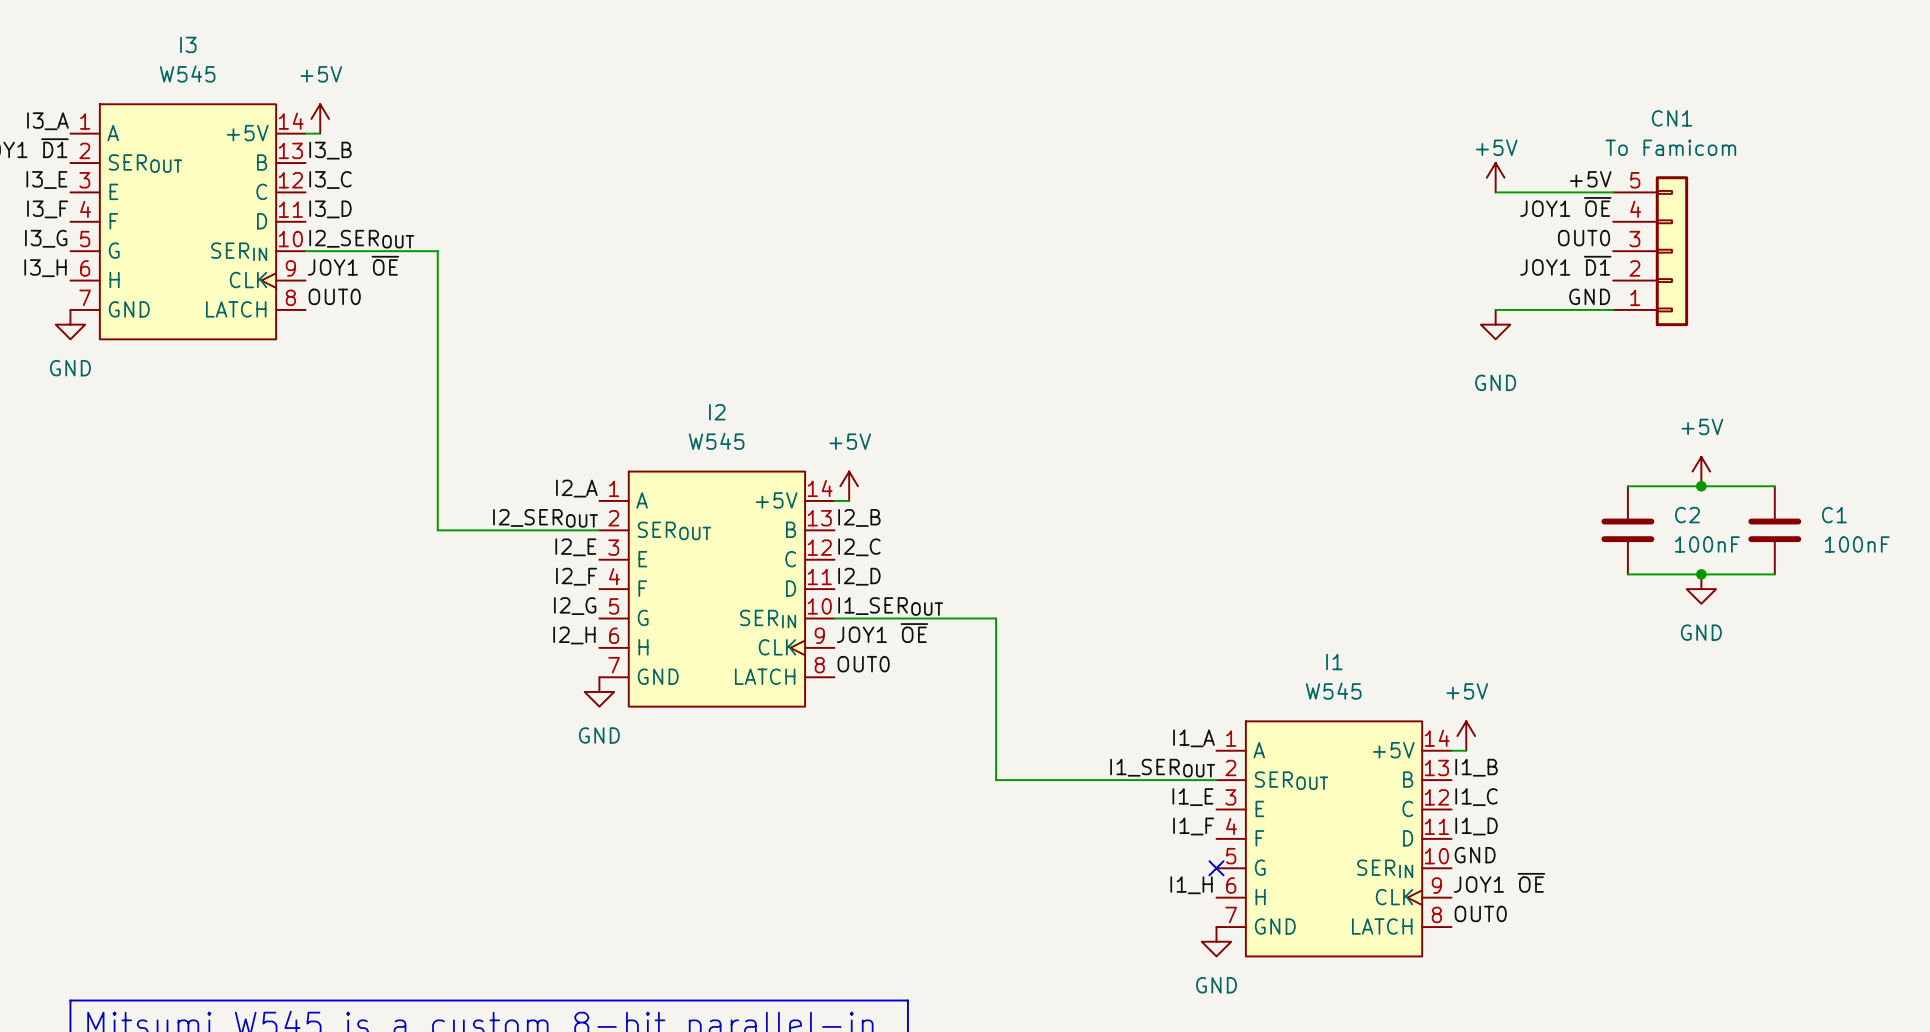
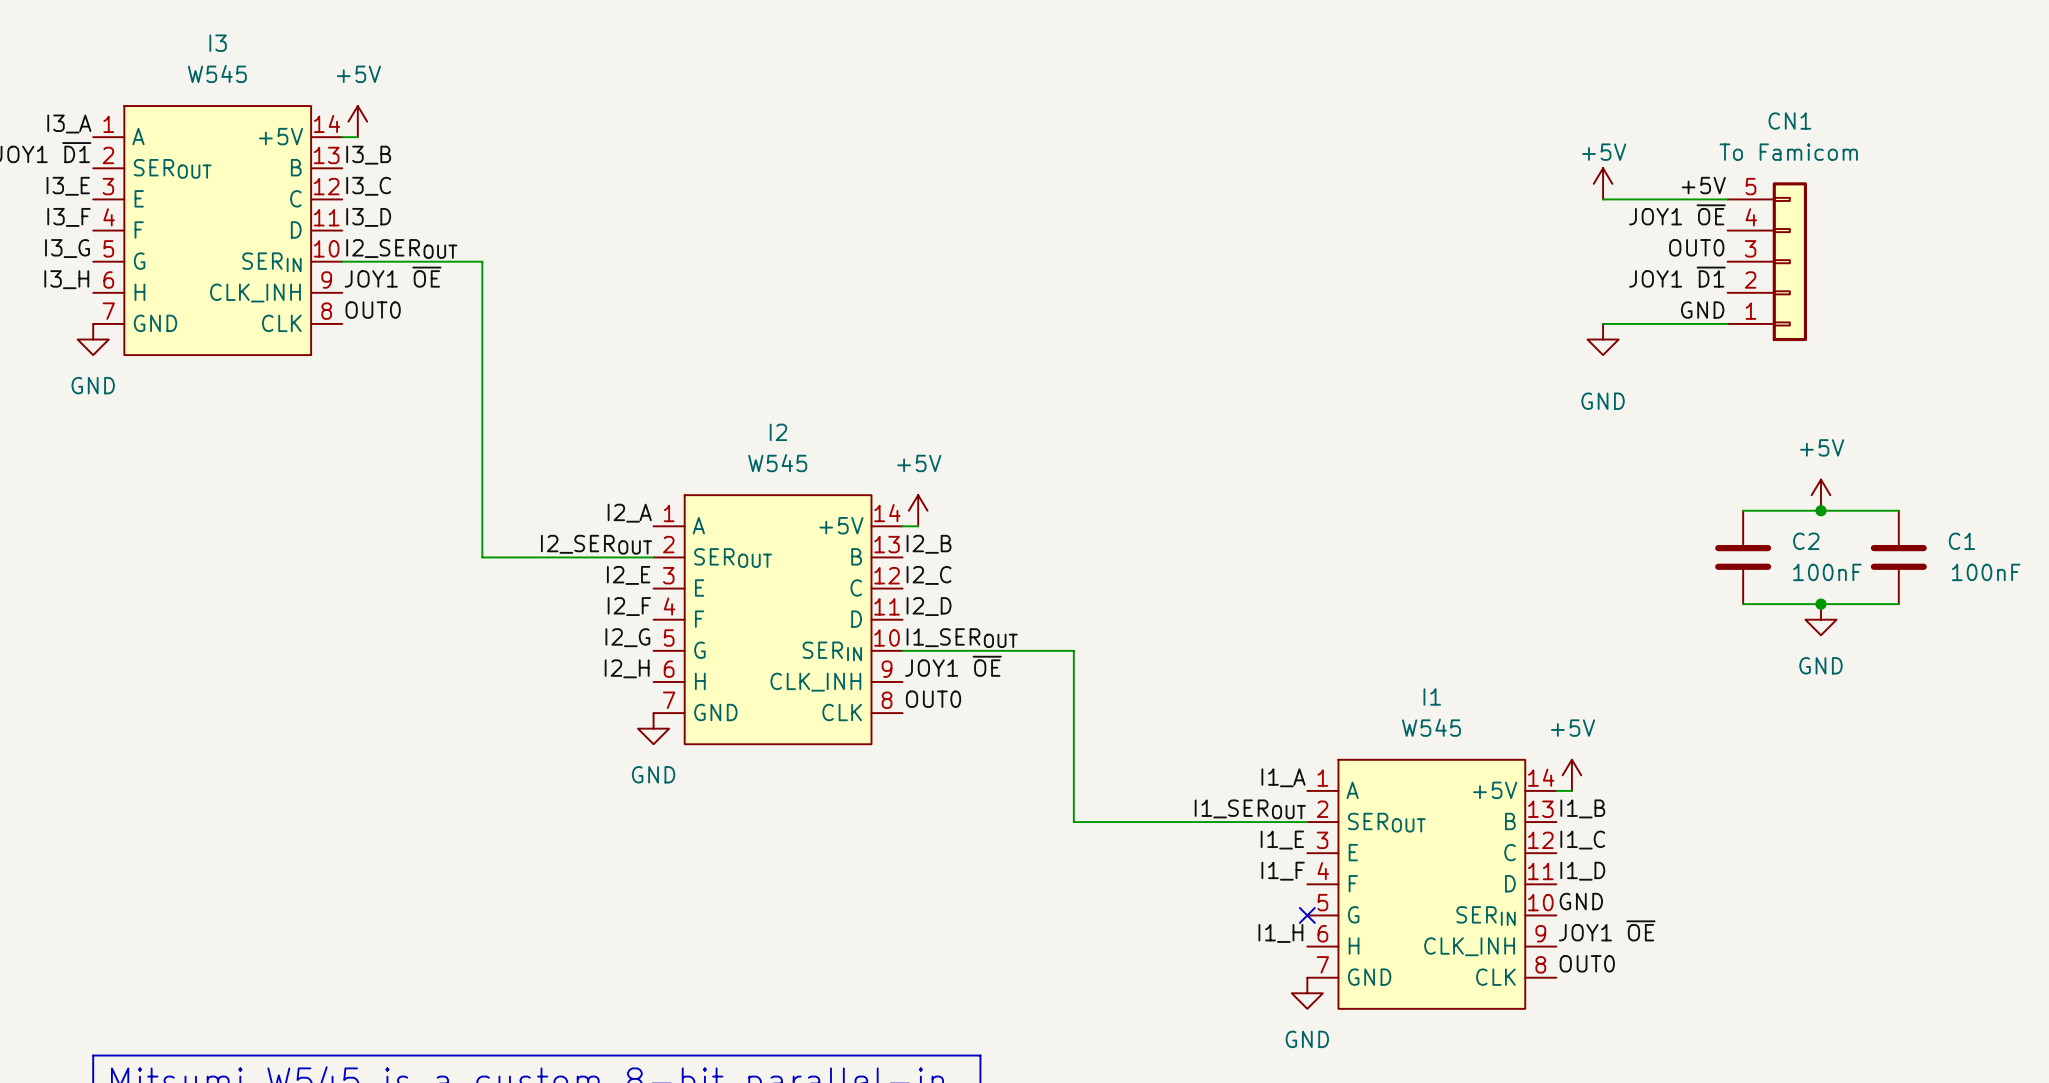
I3 symbol: [70, 104, 306, 340] -> [93, 106, 343, 356]
I2 symbol: [599, 471, 835, 707] -> [653, 495, 903, 745]
I1 symbol: [1216, 721, 1452, 957] -> [1307, 759, 1557, 1009]

